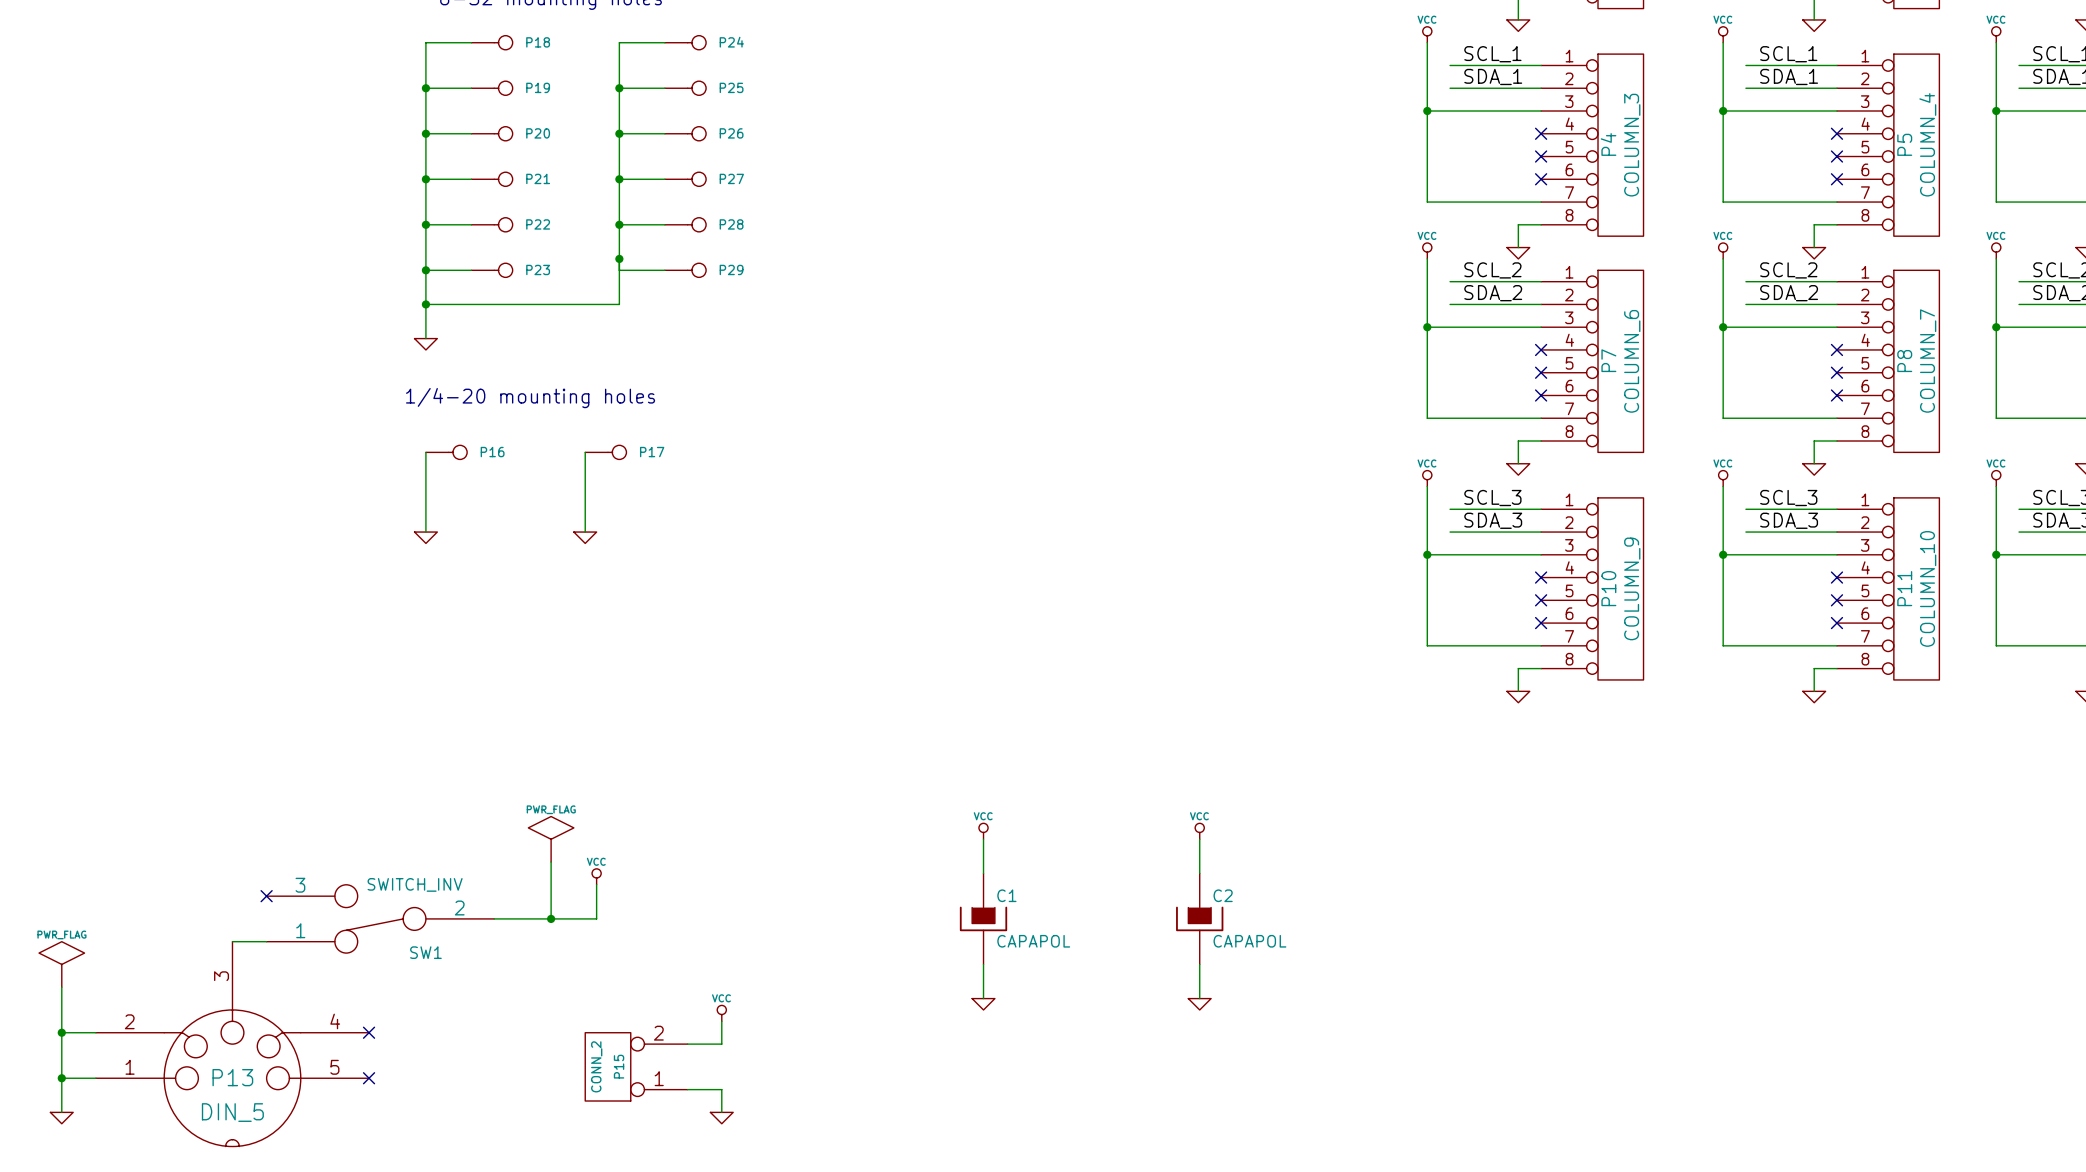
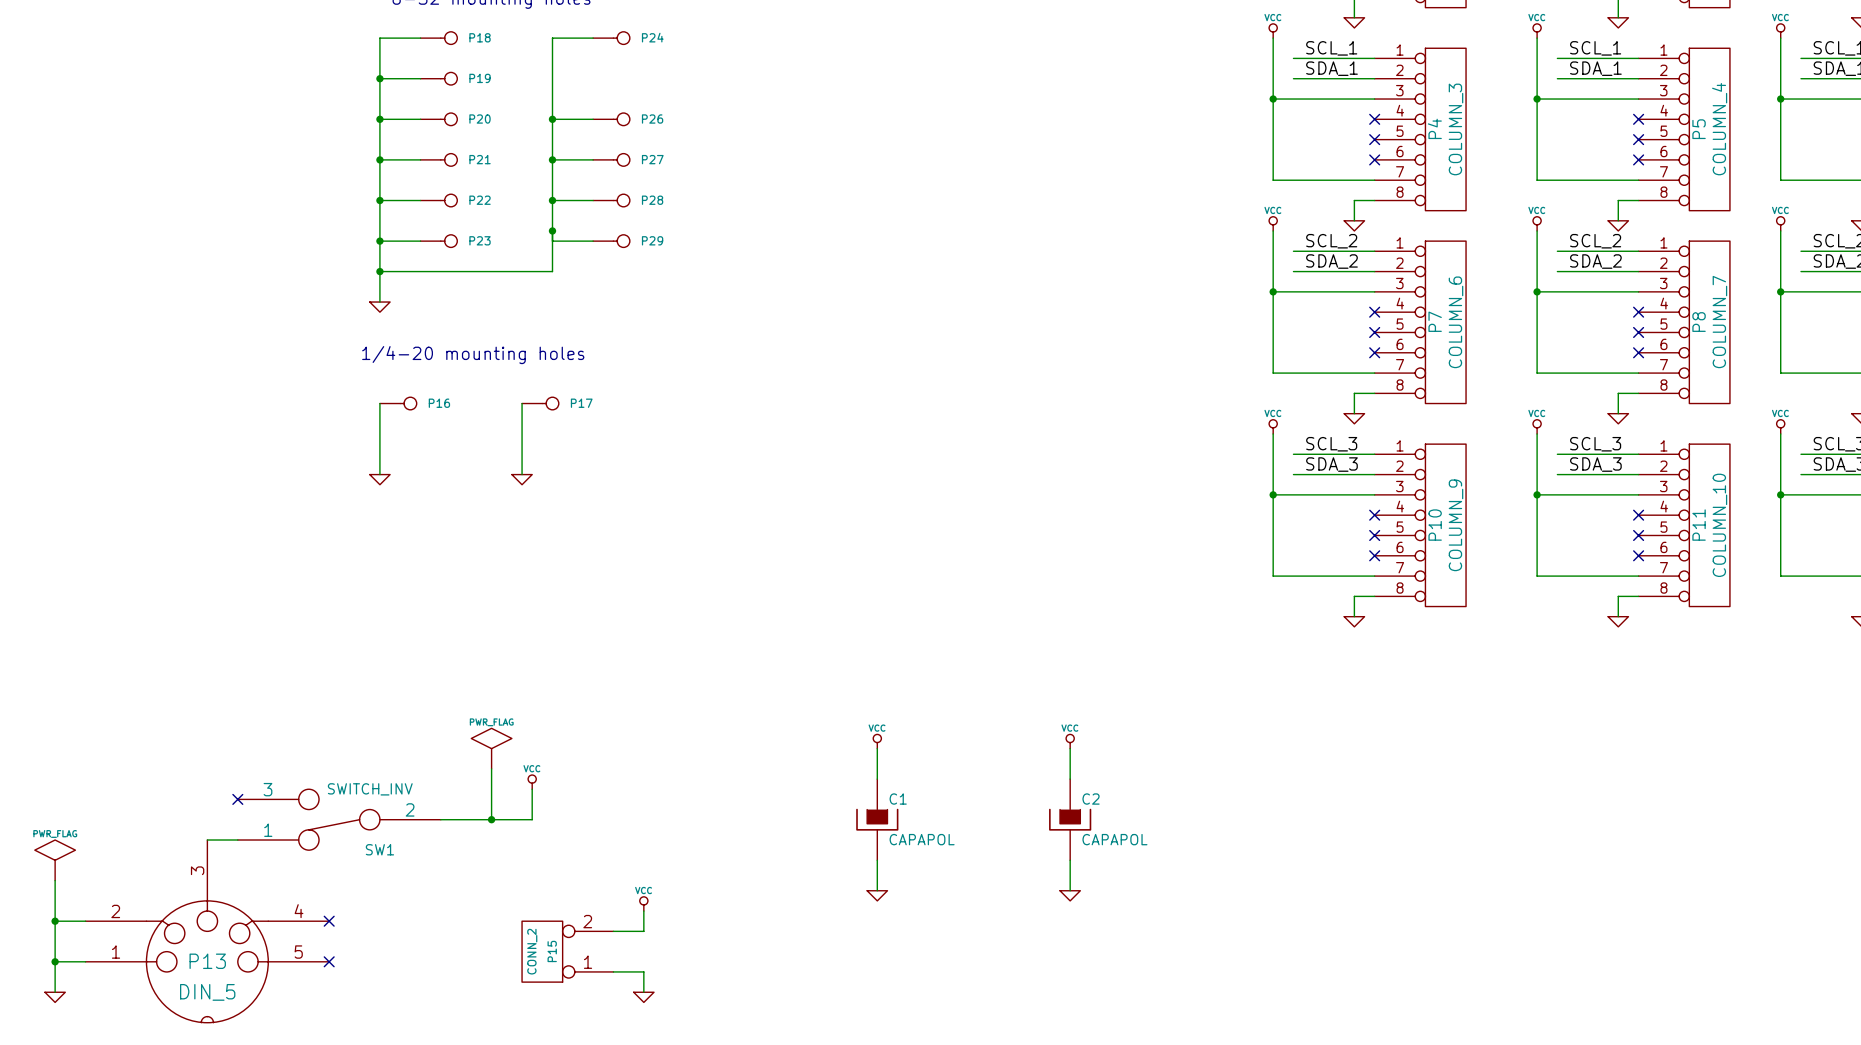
wire: (619, 88) (664, 88) -> none
junction: (619, 88) -> none
P25: (685, 88) -> none

